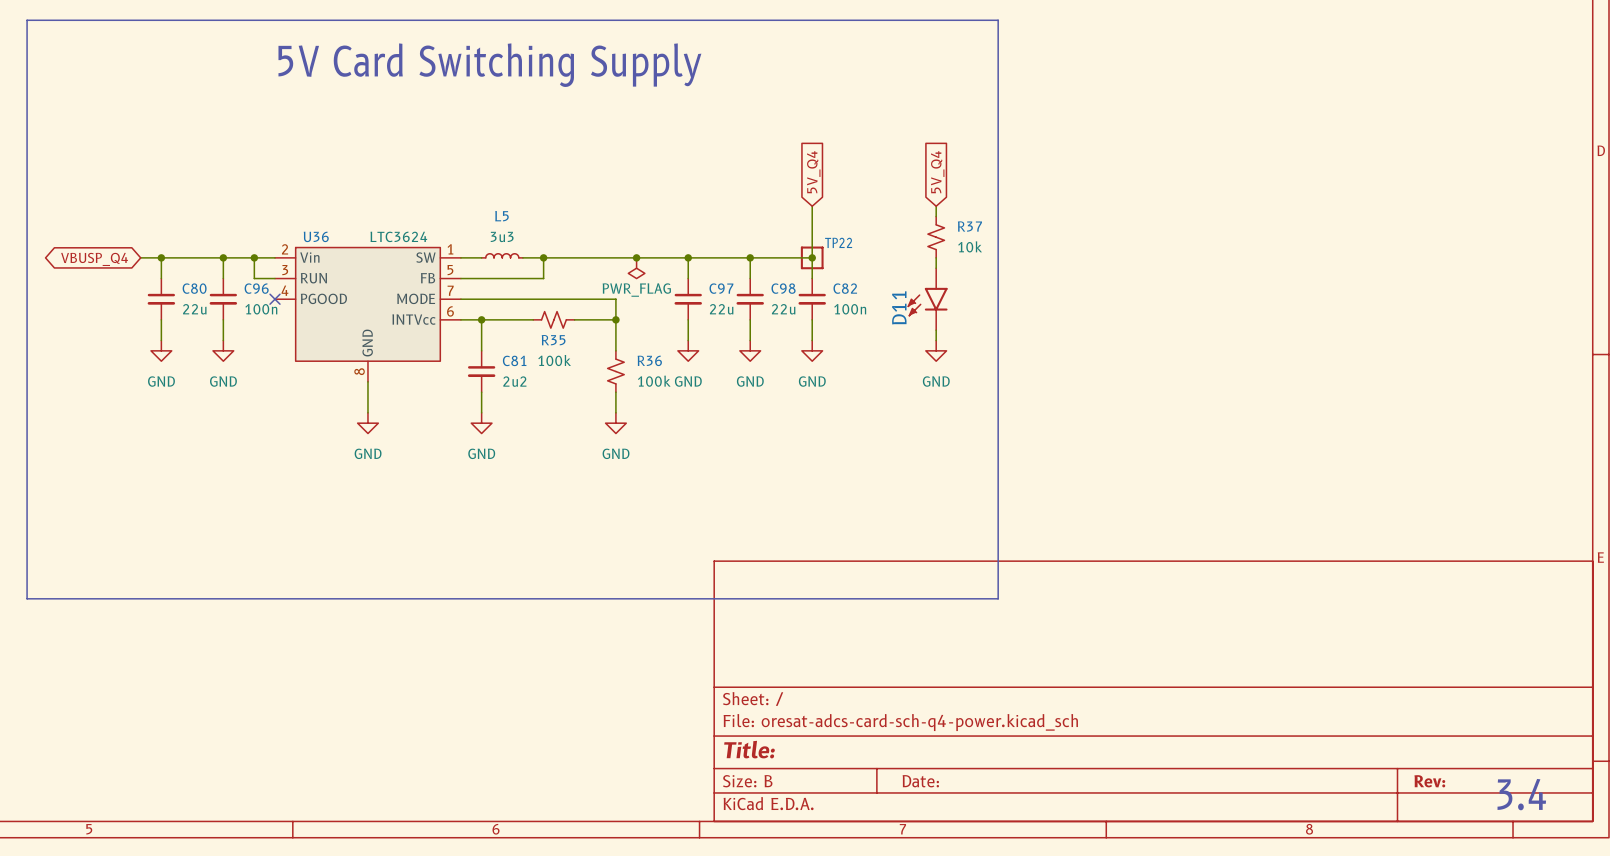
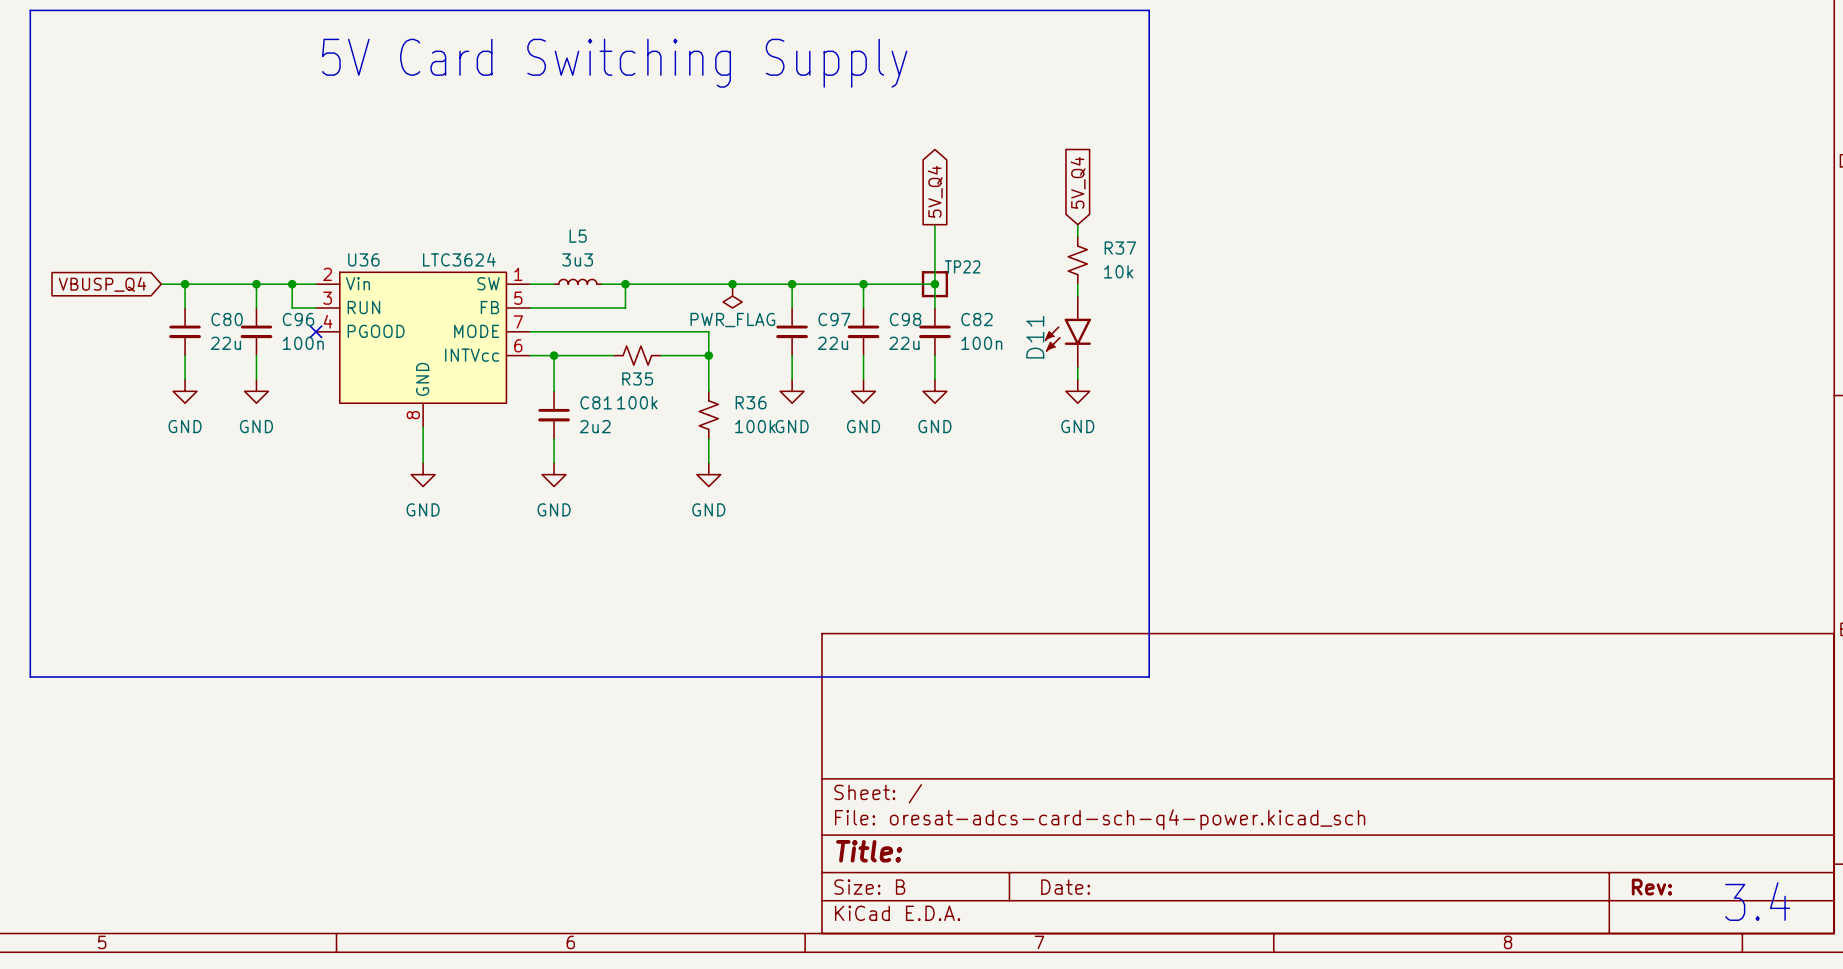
global label shape: input (813, 172) -> output (935, 191)
global label shape: bidirectional (94, 259) -> input (102, 284)

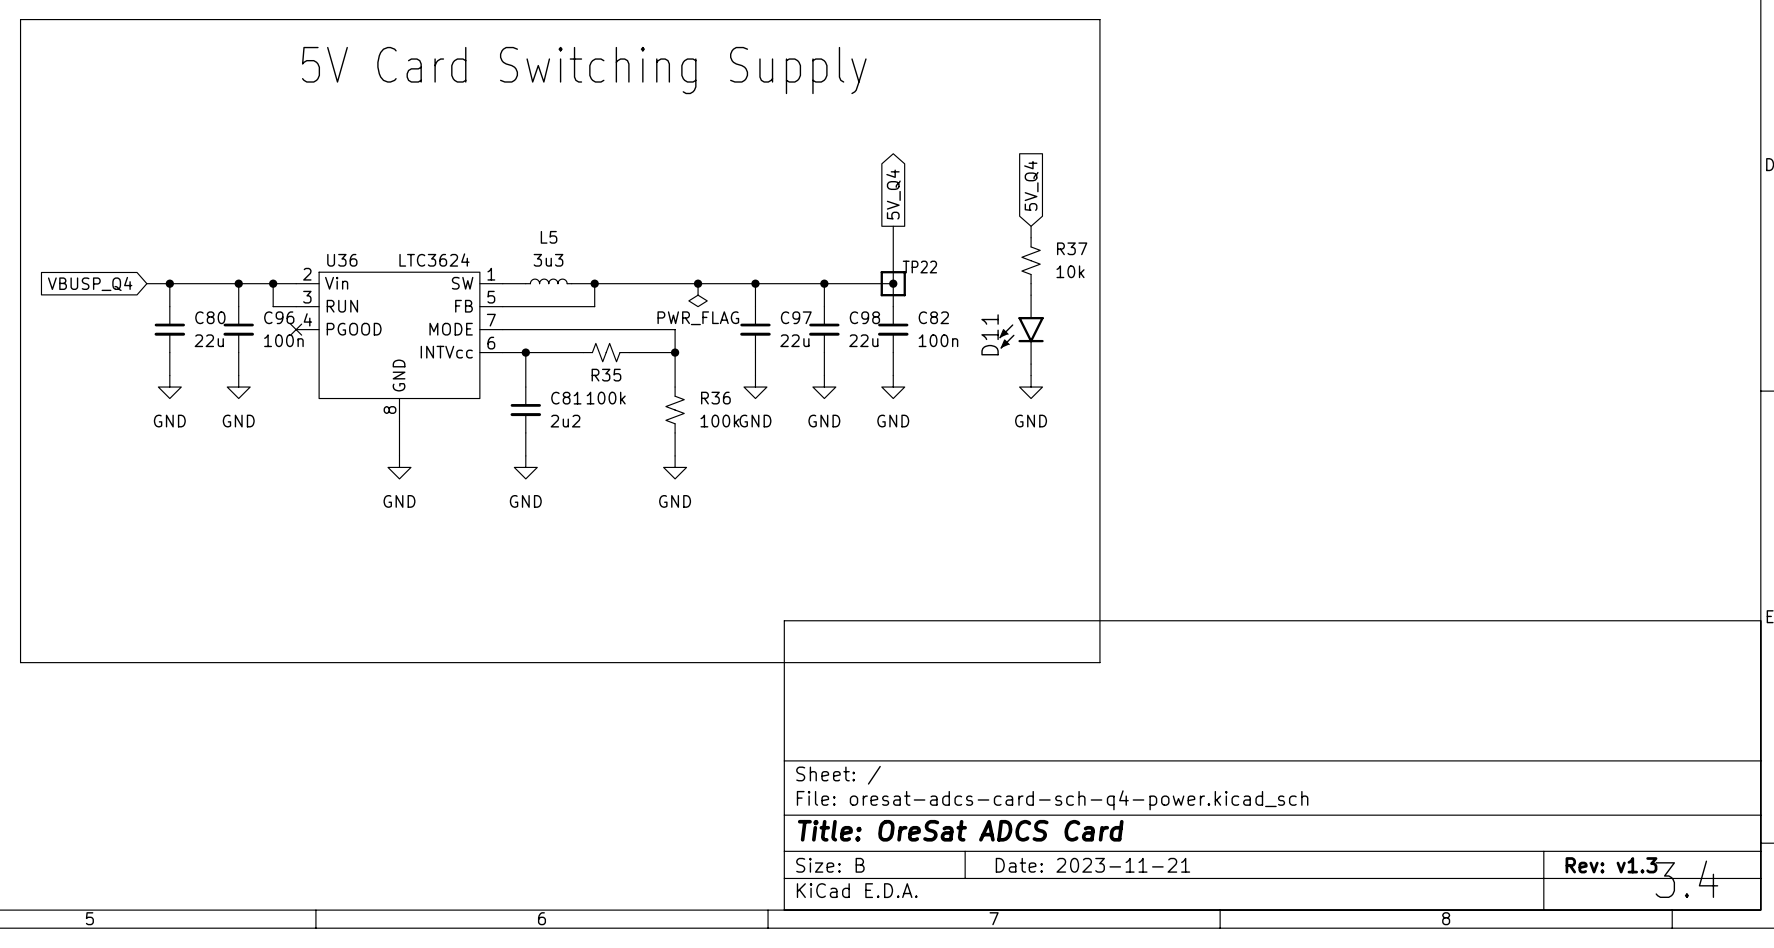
title block: Title: (869, 851) -> Title: OreSat ADCS Card (960, 830)
title block: Date: (1065, 887) -> Date: 2023-11-21 (1092, 865)
title block: Rev: (1651, 887) -> Rev: v1.3 (1611, 865)

